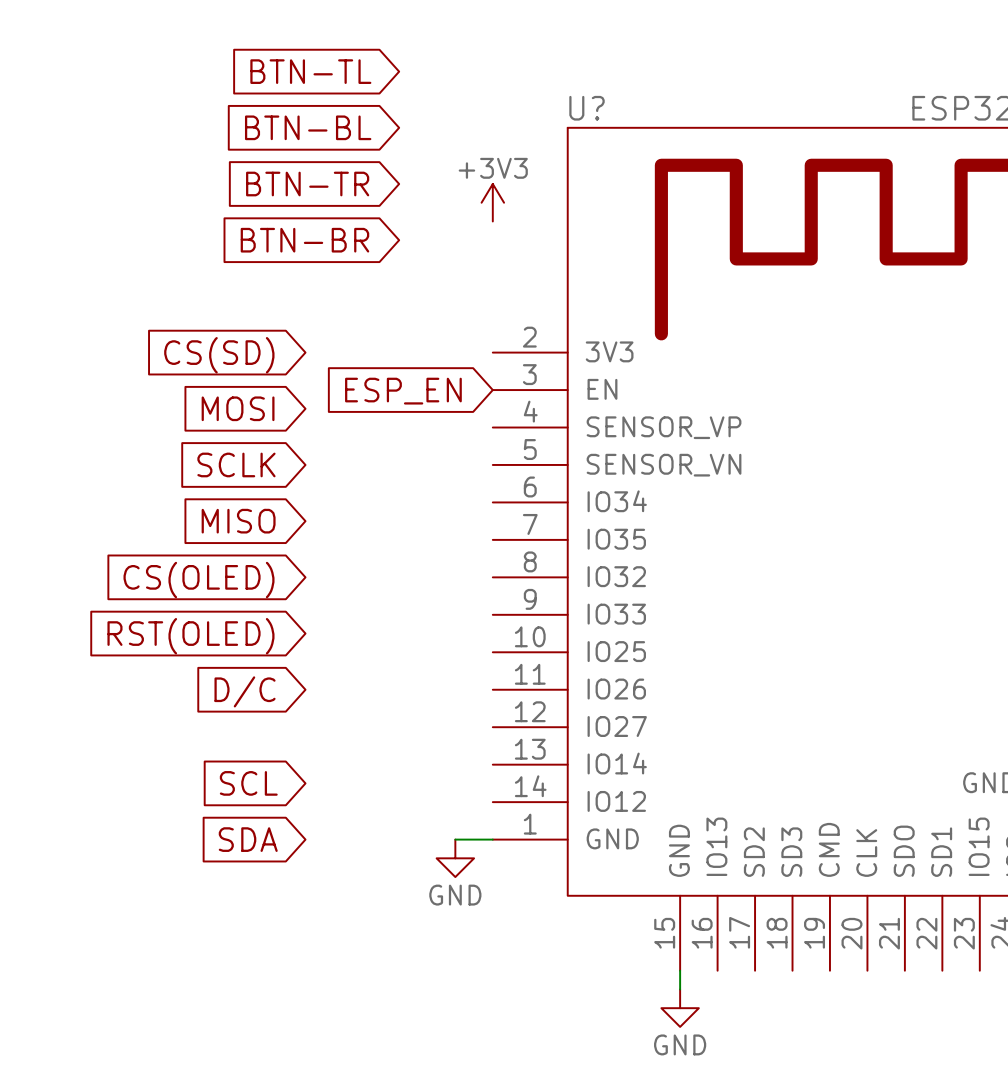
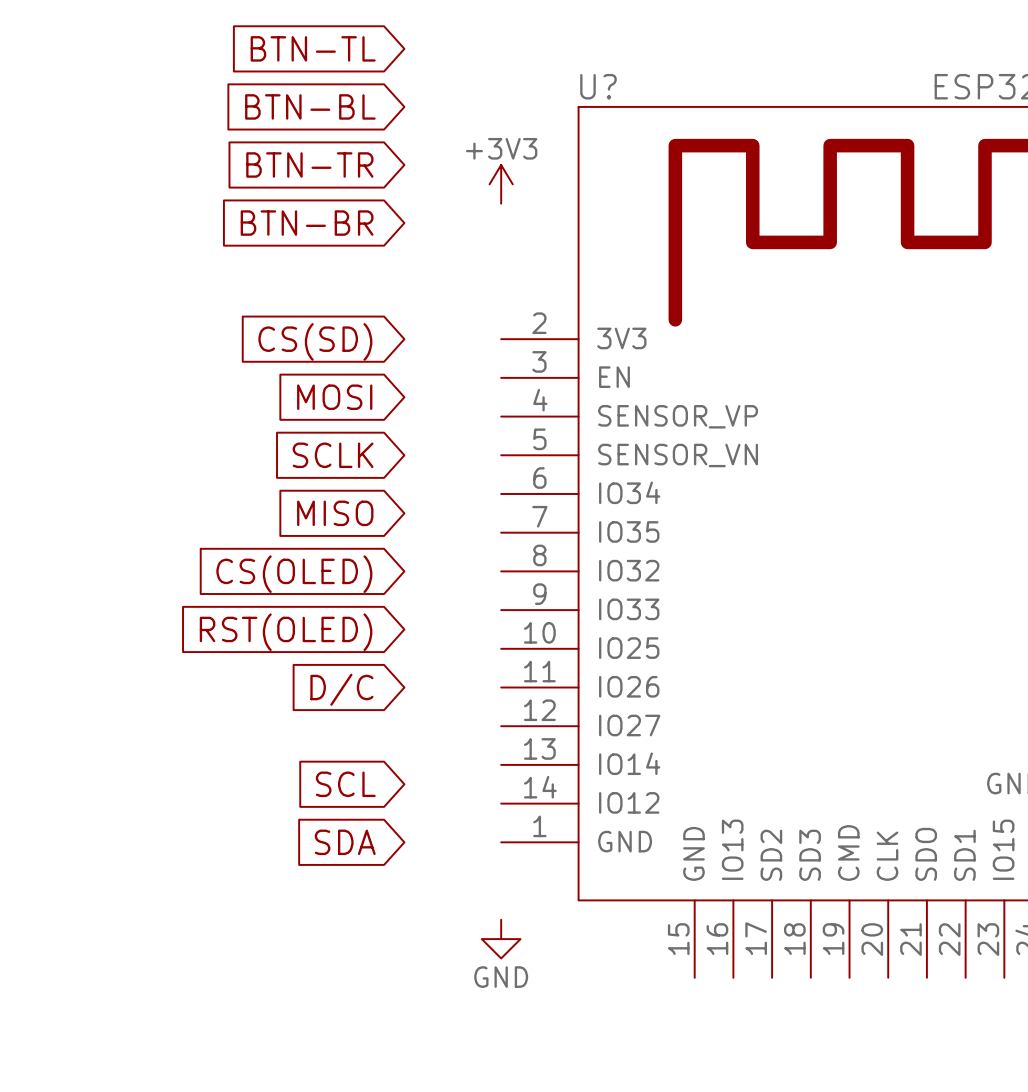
global label position: CS(SD) (219, 355) -> CS(SD) (315, 341)
global label: ESP_EN (403, 391) -> none
global label position: MOSI (238, 408) -> MOSI (334, 397)
global label position: SCLK (236, 464) -> SCLK (333, 455)
global label position: MISO (238, 521) -> MISO (335, 513)
global label position: CS(OLED) (199, 580) -> CS(OLED) (294, 574)
global label position: RST(OLED) (190, 636) -> RST(OLED) (286, 632)
global label position: D/C (245, 691) -> D/C (341, 689)
global label position: SCL (248, 783) -> SCL (345, 784)
global label position: SDA (248, 839) -> SDA (345, 842)
wire: (455, 839) (492, 839) -> none
power symbol position: GND (455, 858) -> GND (501, 939)
wire: (680, 970) (680, 989) -> none
power symbol: GND (680, 1008) -> none

